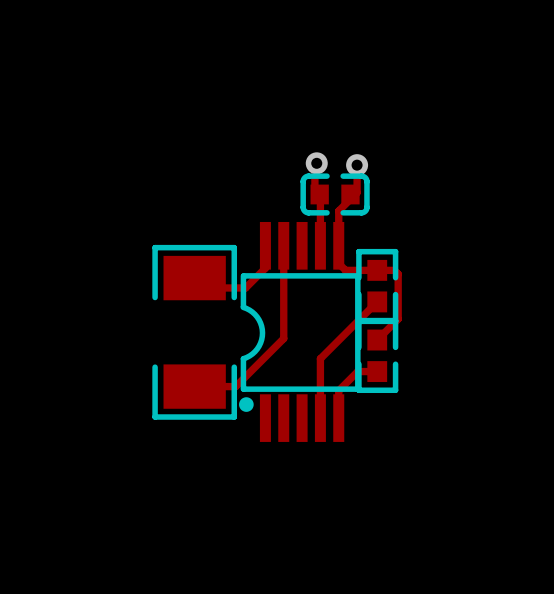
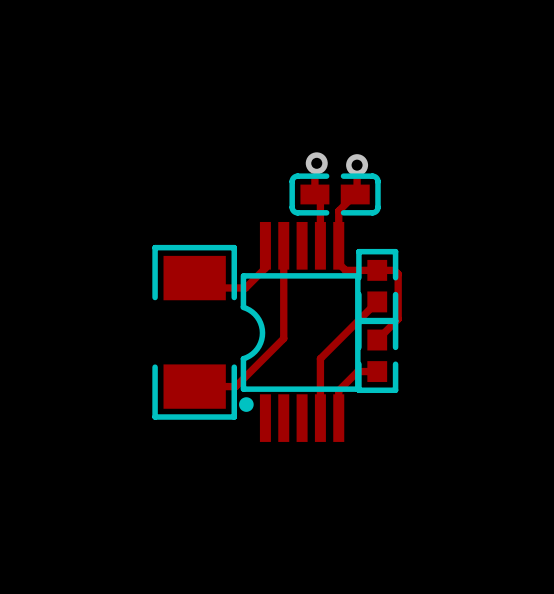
part footprint: [300, 173, 370, 216] -> [289, 173, 381, 216]

